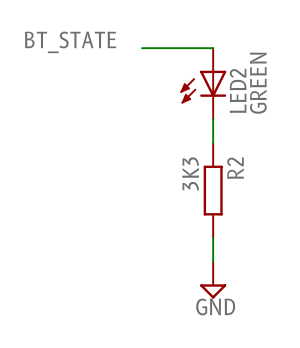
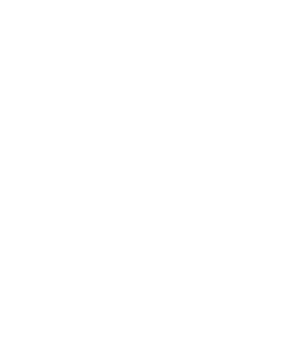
label: BT_STATE (70, 42) -> none
wire: (141, 48) (213, 48) -> none
LED2: GREEN (203, 83) -> none
wire: (213, 119) (213, 143) -> none
R2: 3K3 (213, 190) -> none
wire: (213, 238) (213, 261) -> none
power symbol: GND (213, 280) -> none

